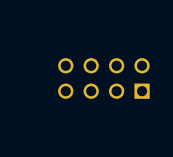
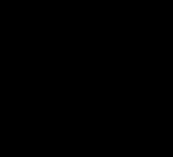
part: (103, 78) -> none

